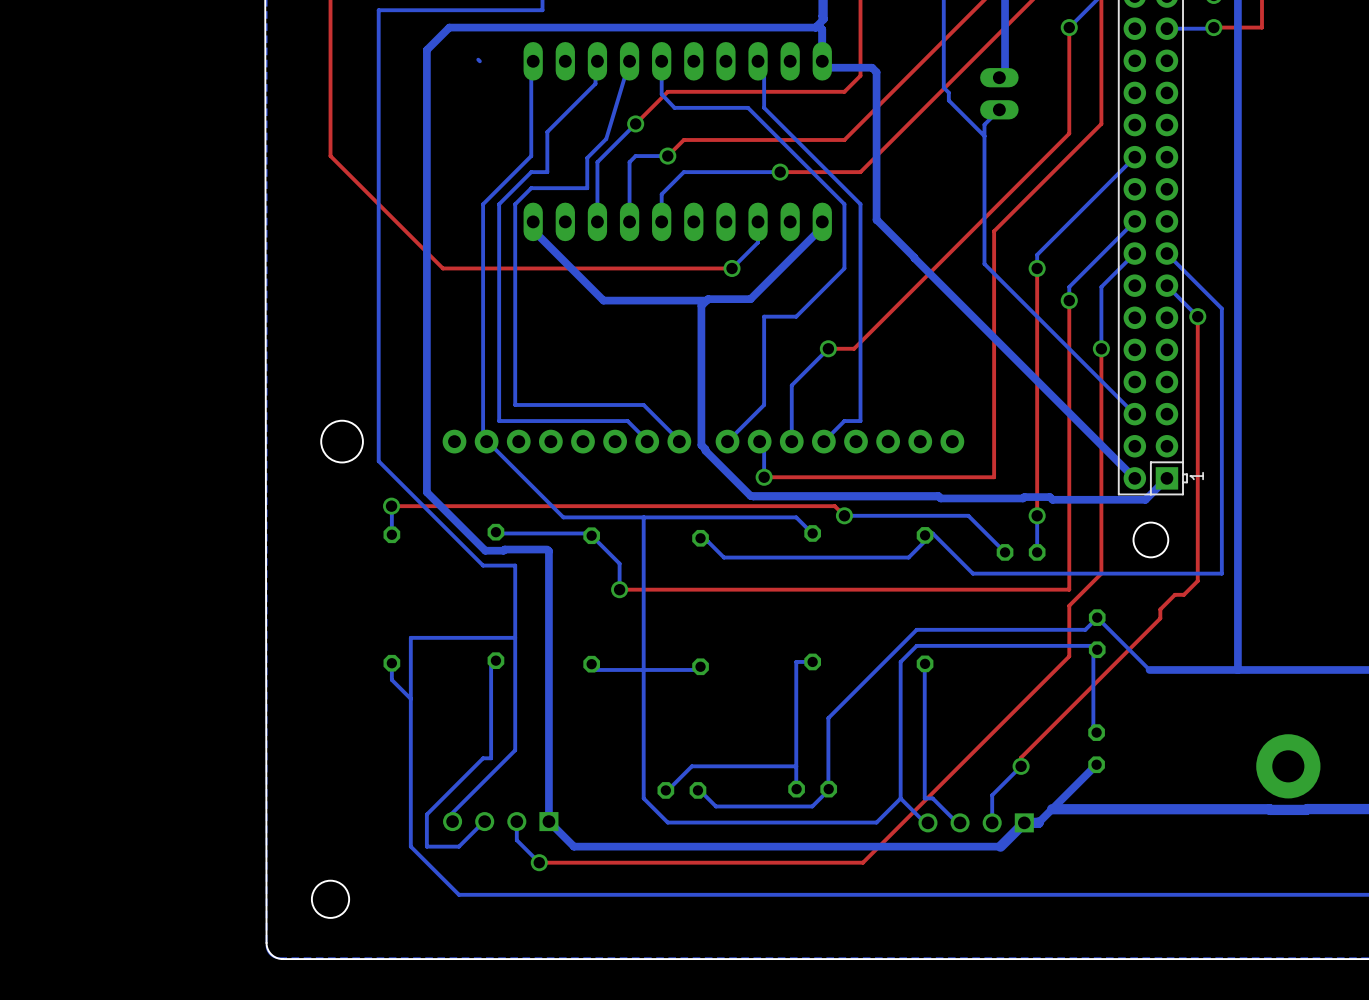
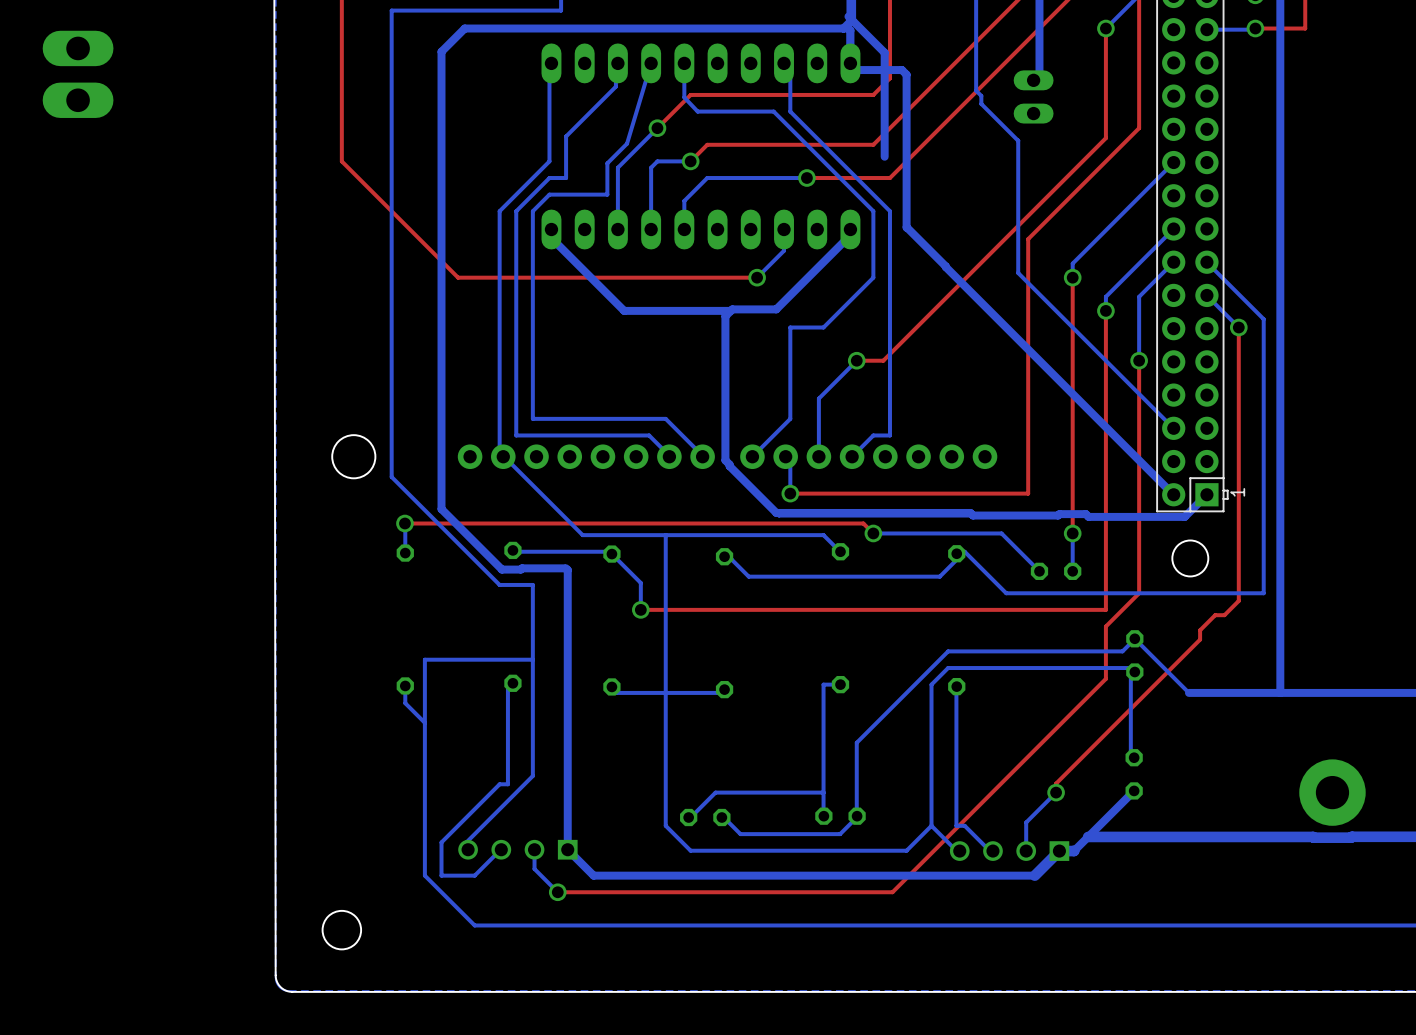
bottom track: none -> (848, 16) (884, 52) (884, 156)
bottom track: (478, 59) (479, 61) -> none
part: none -> (78, 74)
bottom track: (999, 109) (984, 124) (984, 135) -> none

